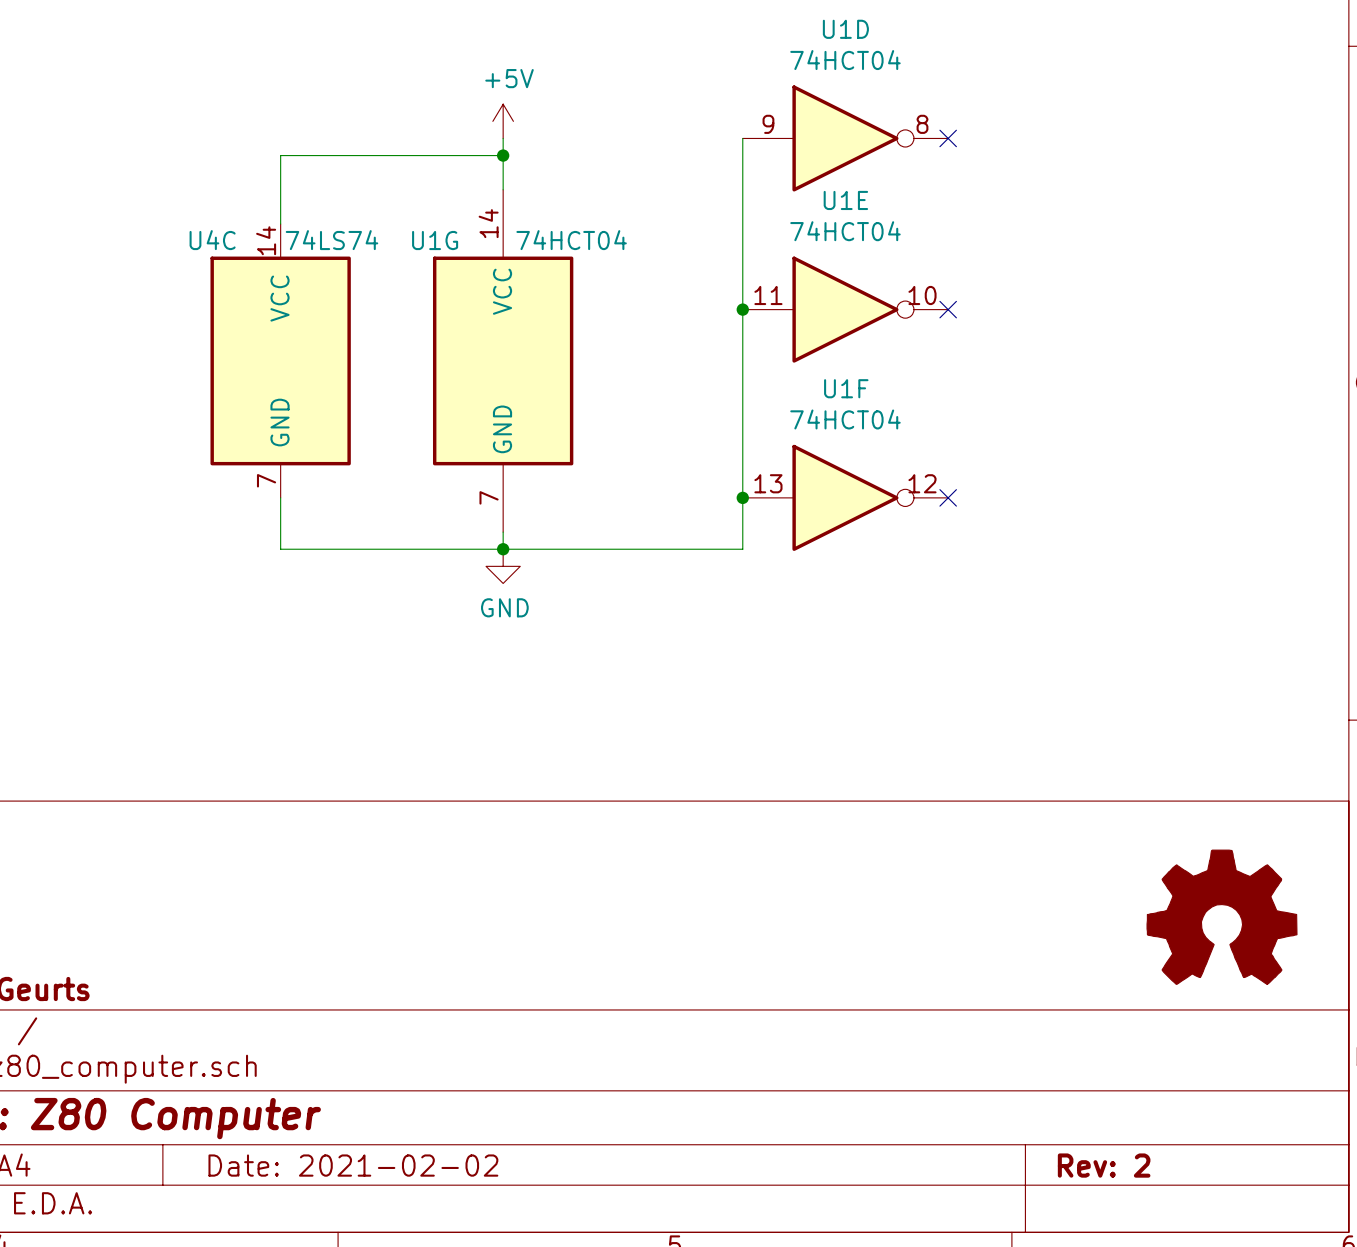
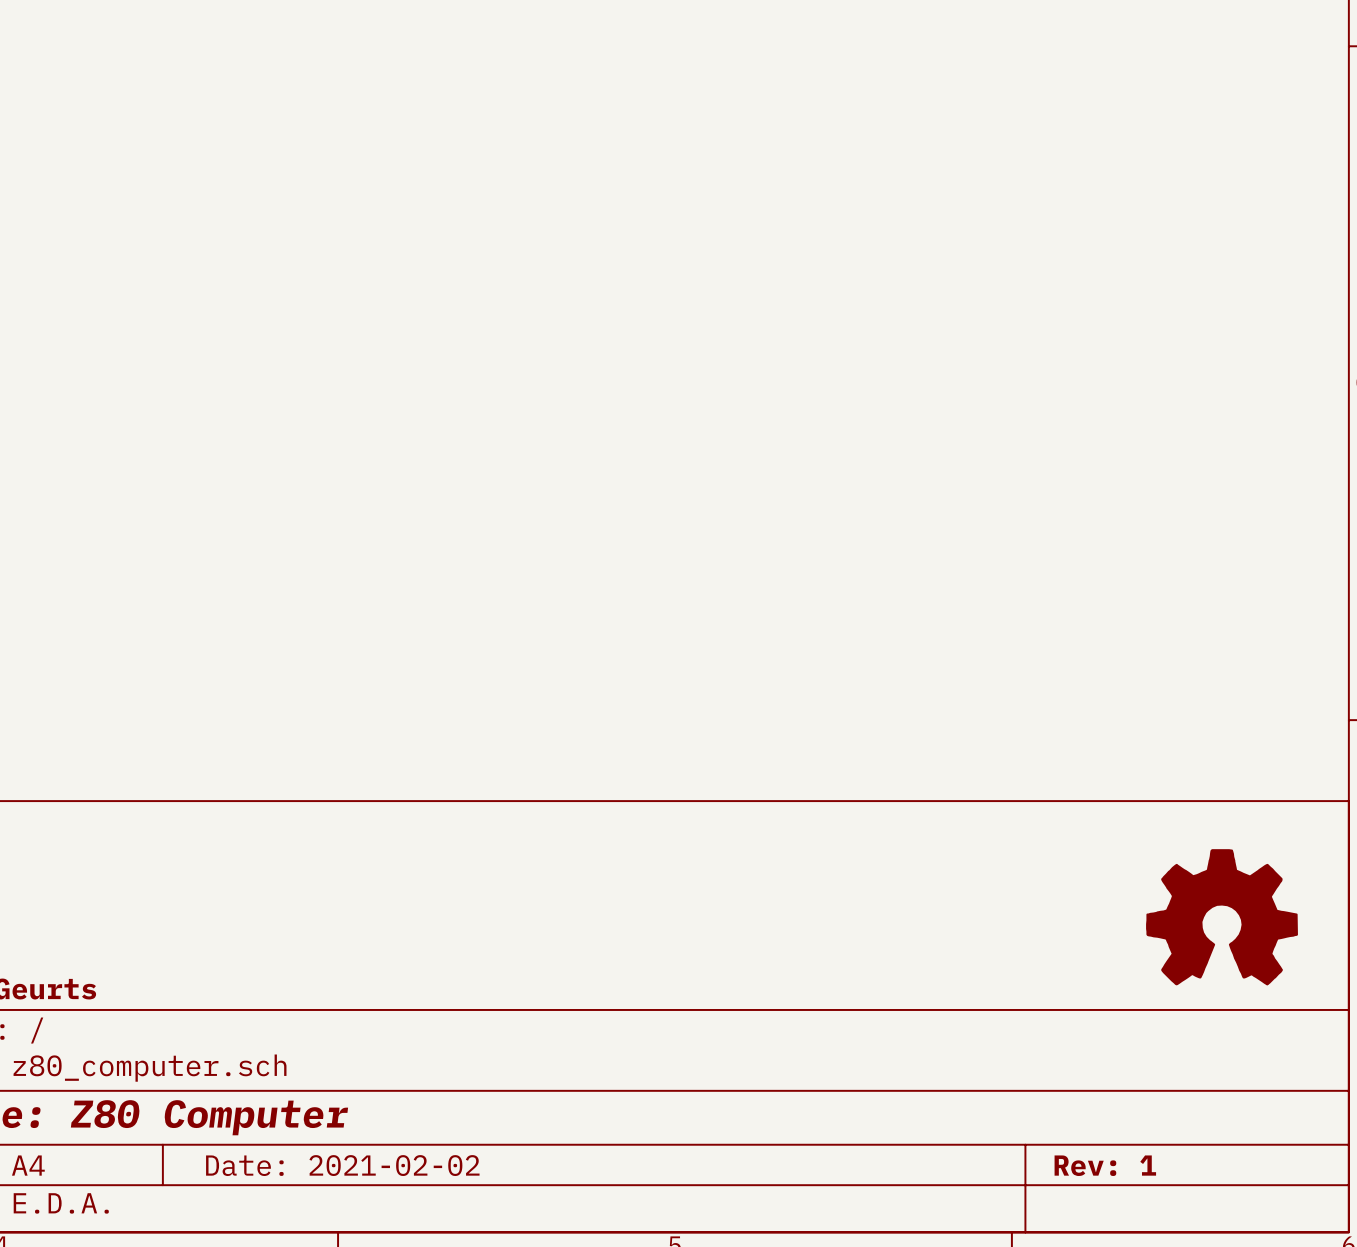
power symbol: +5V (503, 121) -> none
wire: (503, 138) (503, 189) -> none
wire: (742, 138) (742, 549) (280, 549) (280, 497) -> none
U1D: 74HCT04 (845, 138) -> none
no-connect mark: (948, 138) -> none
wire: (503, 155) (280, 155) (280, 224) -> none
junction: (503, 155) -> none
junction: (742, 309) -> none
U1E: 74HCT04 (845, 309) -> none
no-connect mark: (948, 309) -> none
U4C: 74LS74 (280, 360) -> none
U1G: 74HCT04 (503, 360) -> none
junction: (742, 497) -> none
U1F: 74HCT04 (845, 497) -> none
no-connect mark: (948, 497) -> none
wire: (503, 532) (503, 549) -> none
junction: (503, 549) -> none
power symbol: GND (503, 566) -> none
title block: Rev: 2 (1104, 1165) -> Rev: 1 (1105, 1165)

